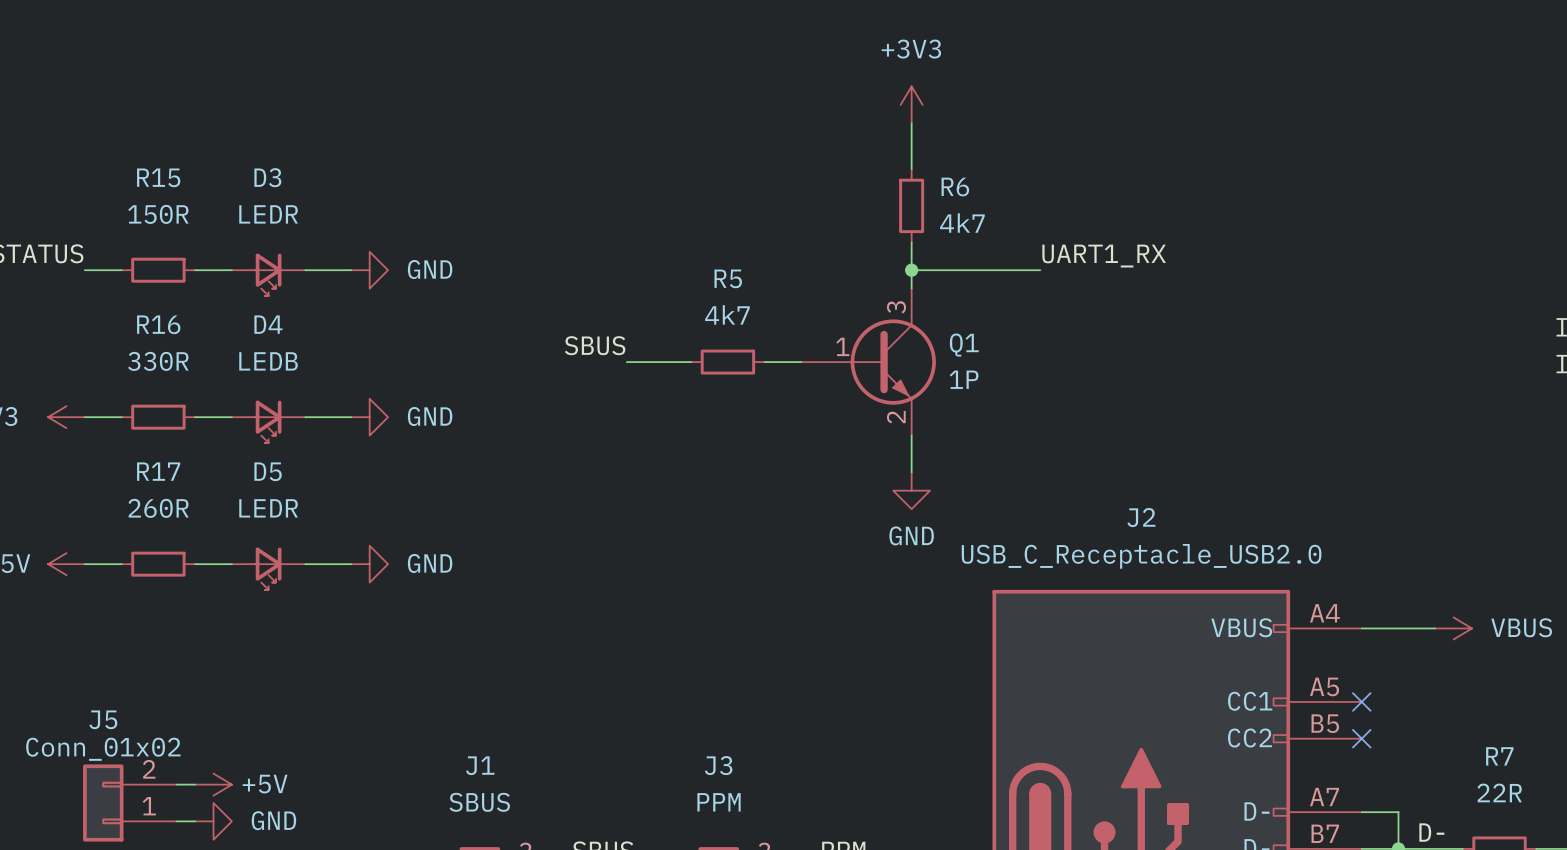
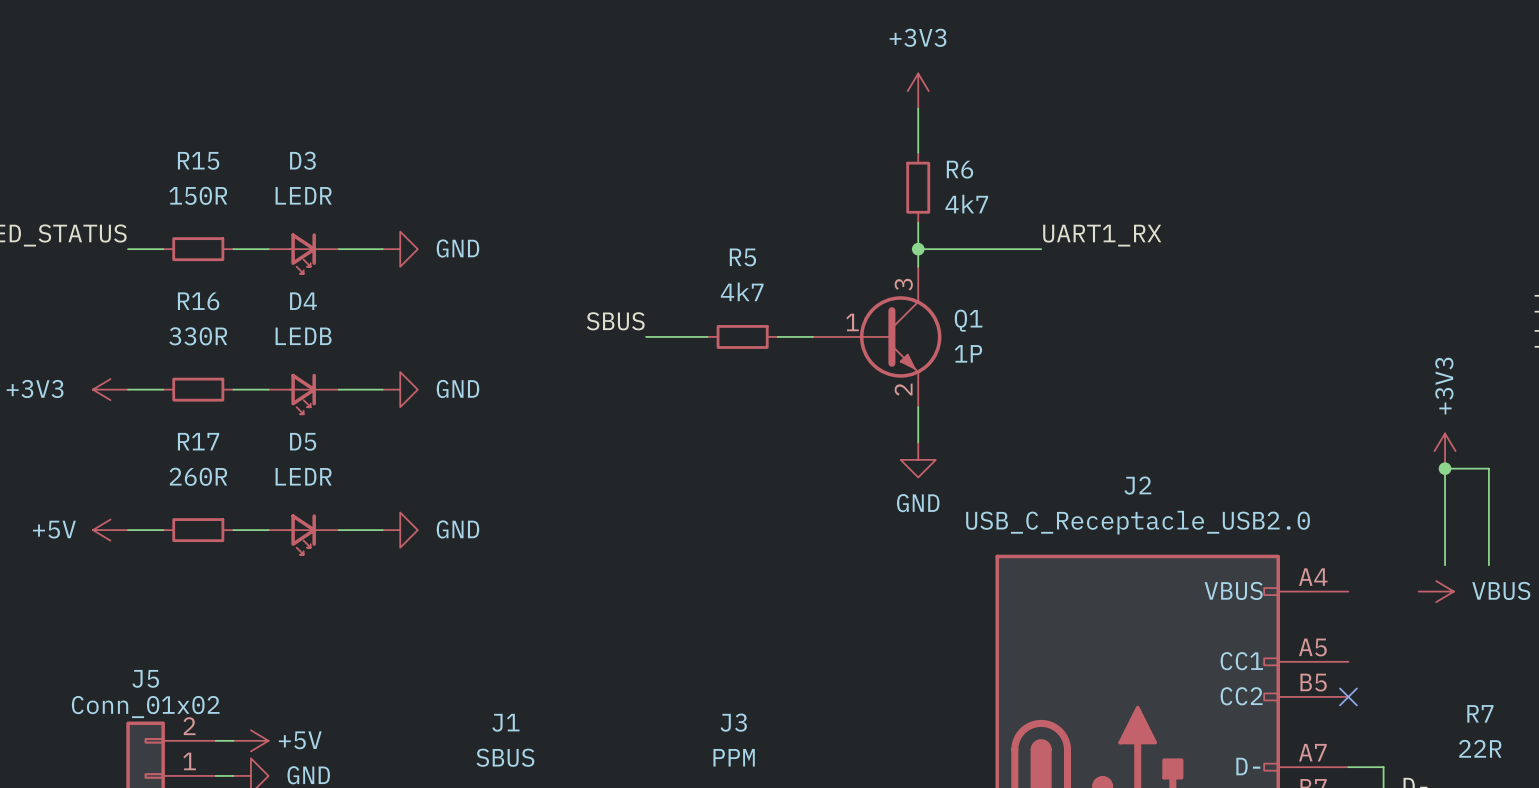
power symbol: none -> +3V3 (1445, 451)
junction: none -> (1445, 468)
wire: none -> (1445, 565) (1445, 468) (1488, 468) (1488, 565)
wire: (1361, 628) (1435, 628) -> none
no-connect mark: (1361, 701) -> none

